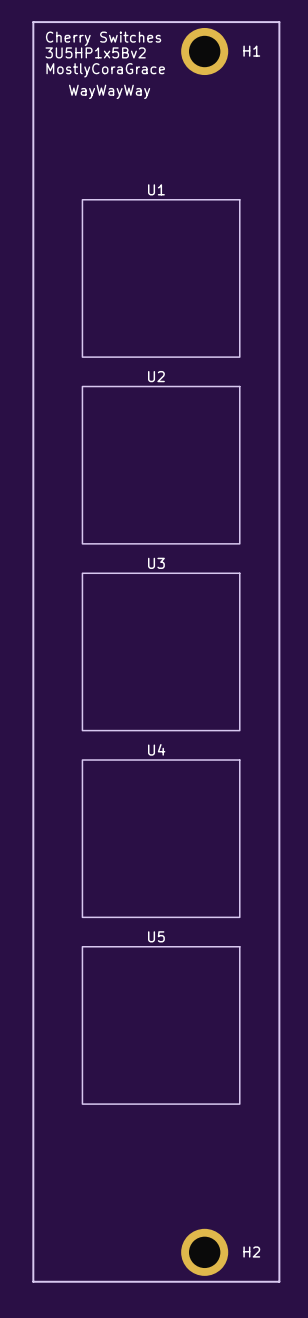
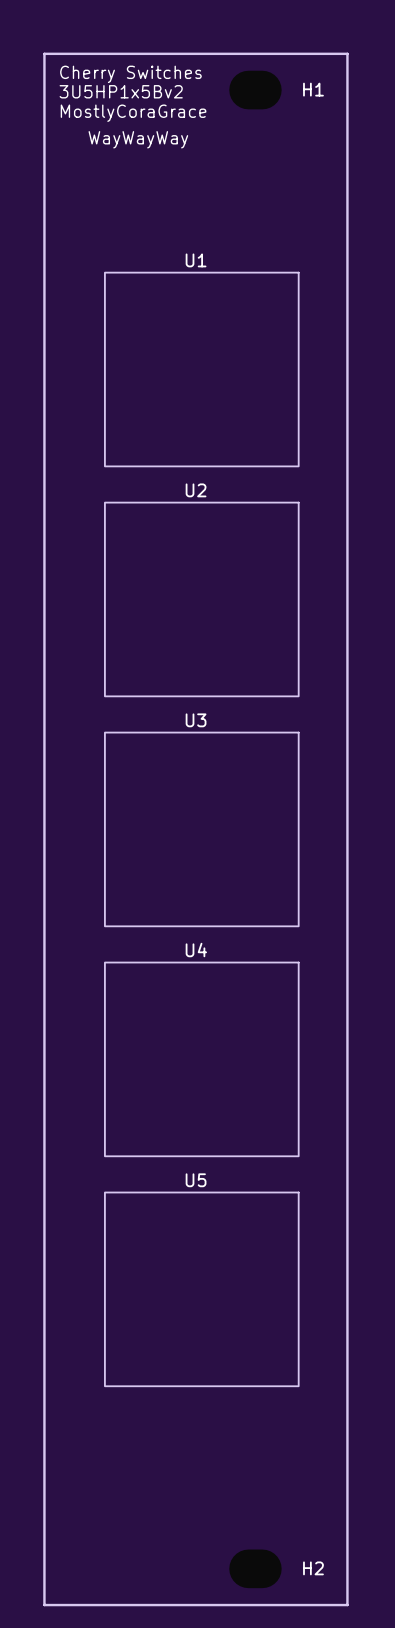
H1 footprint: [181, 27, 229, 76] -> [229, 70, 282, 110]
H2 footprint: [181, 1228, 229, 1276] -> [229, 1549, 282, 1589]

